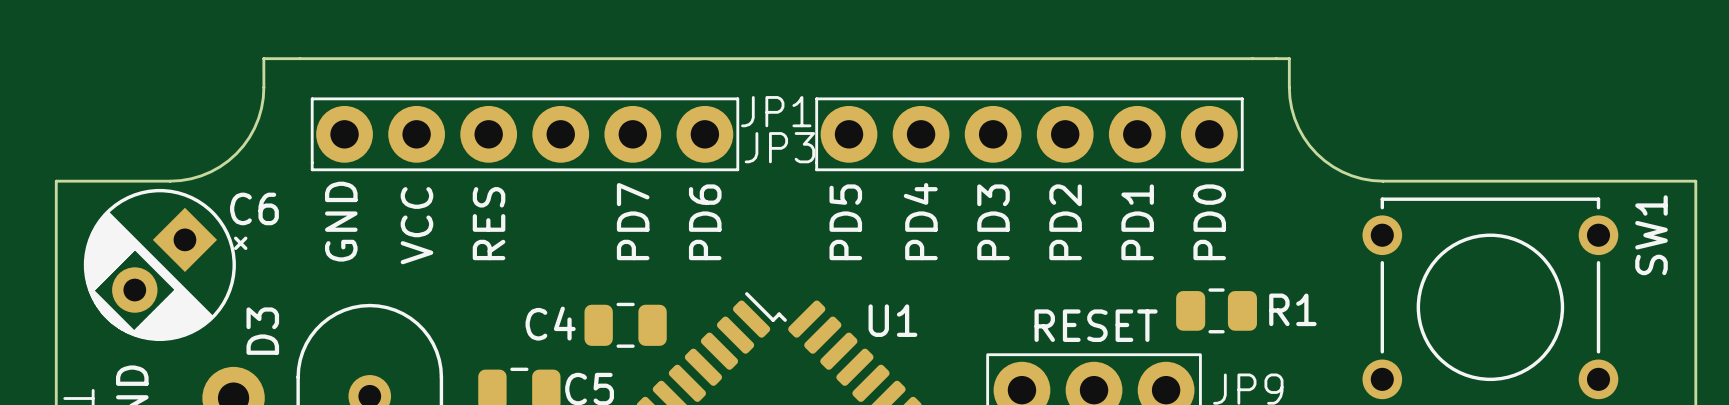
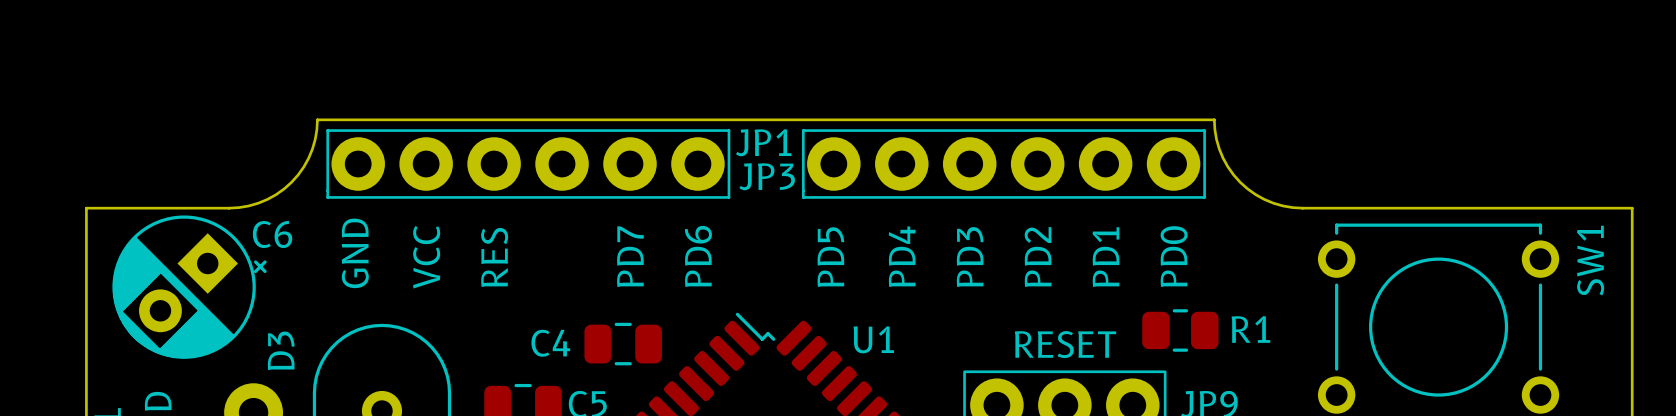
board edge: (170, 181) (191, 178) (210, 171) (228, 160) (243, 145) (254, 128) (261, 108) (263, 58) (1289, 58) (1291, 108) (1298, 128) (1309, 145) (1324, 160) (1342, 171) (1362, 178) (1383, 181) -> (193, 208) (248, 205) (267, 199) (284, 188) (298, 174) (308, 158) (315, 139) (317, 119) (1214, 119) (1216, 139) (1223, 158) (1233, 174) (1247, 188) (1264, 199) (1283, 205) (1337, 208)

